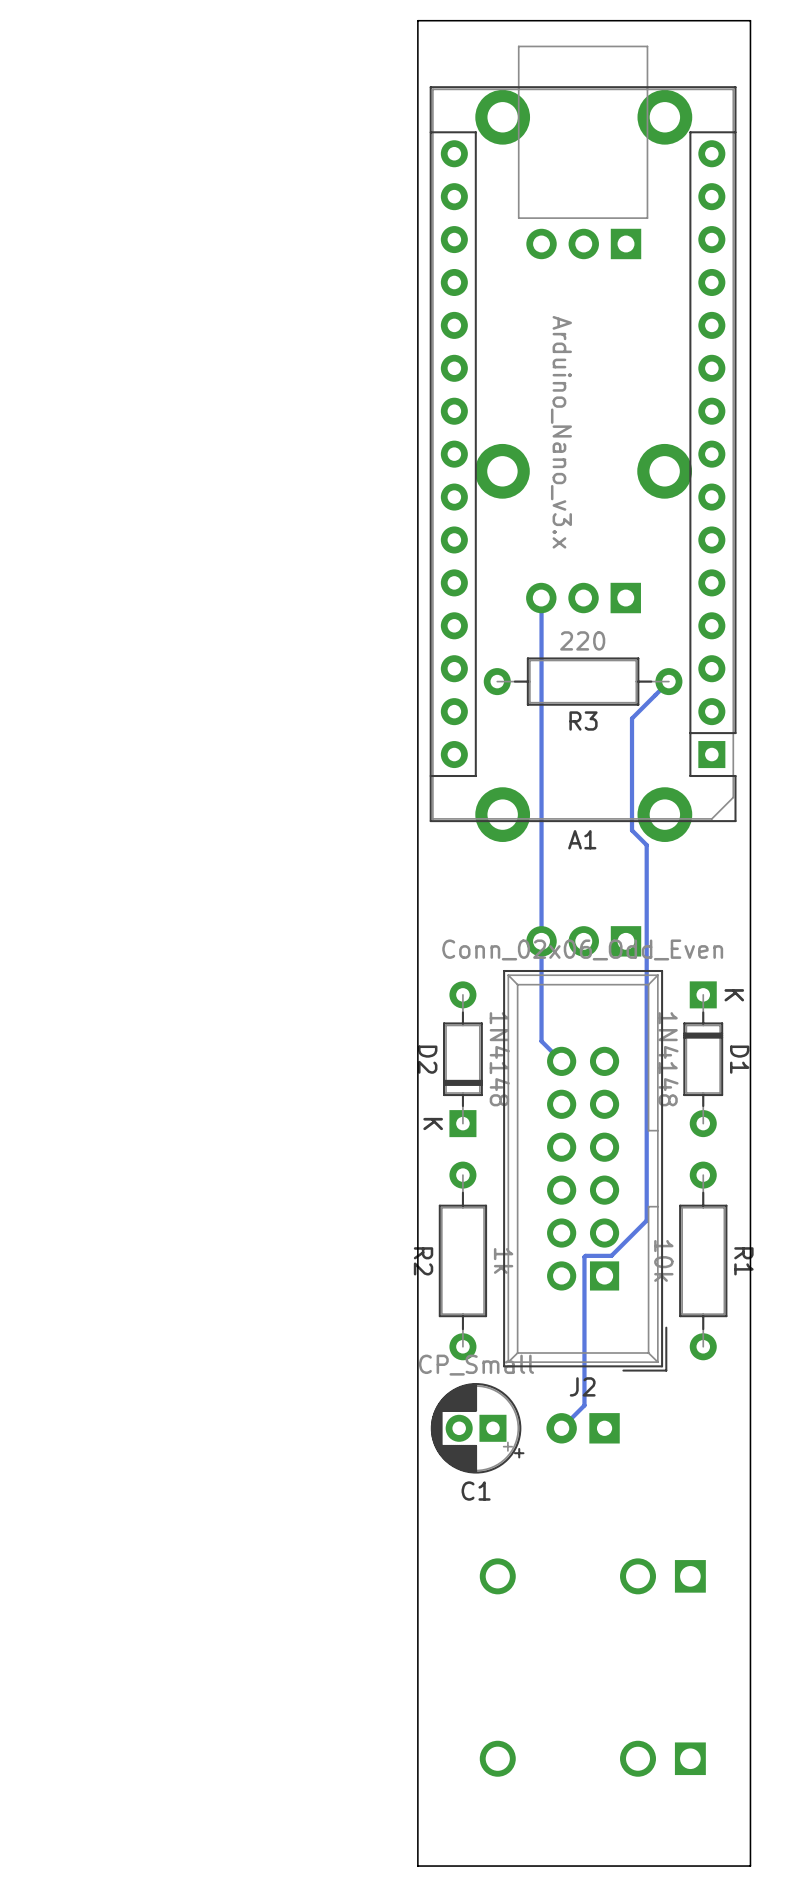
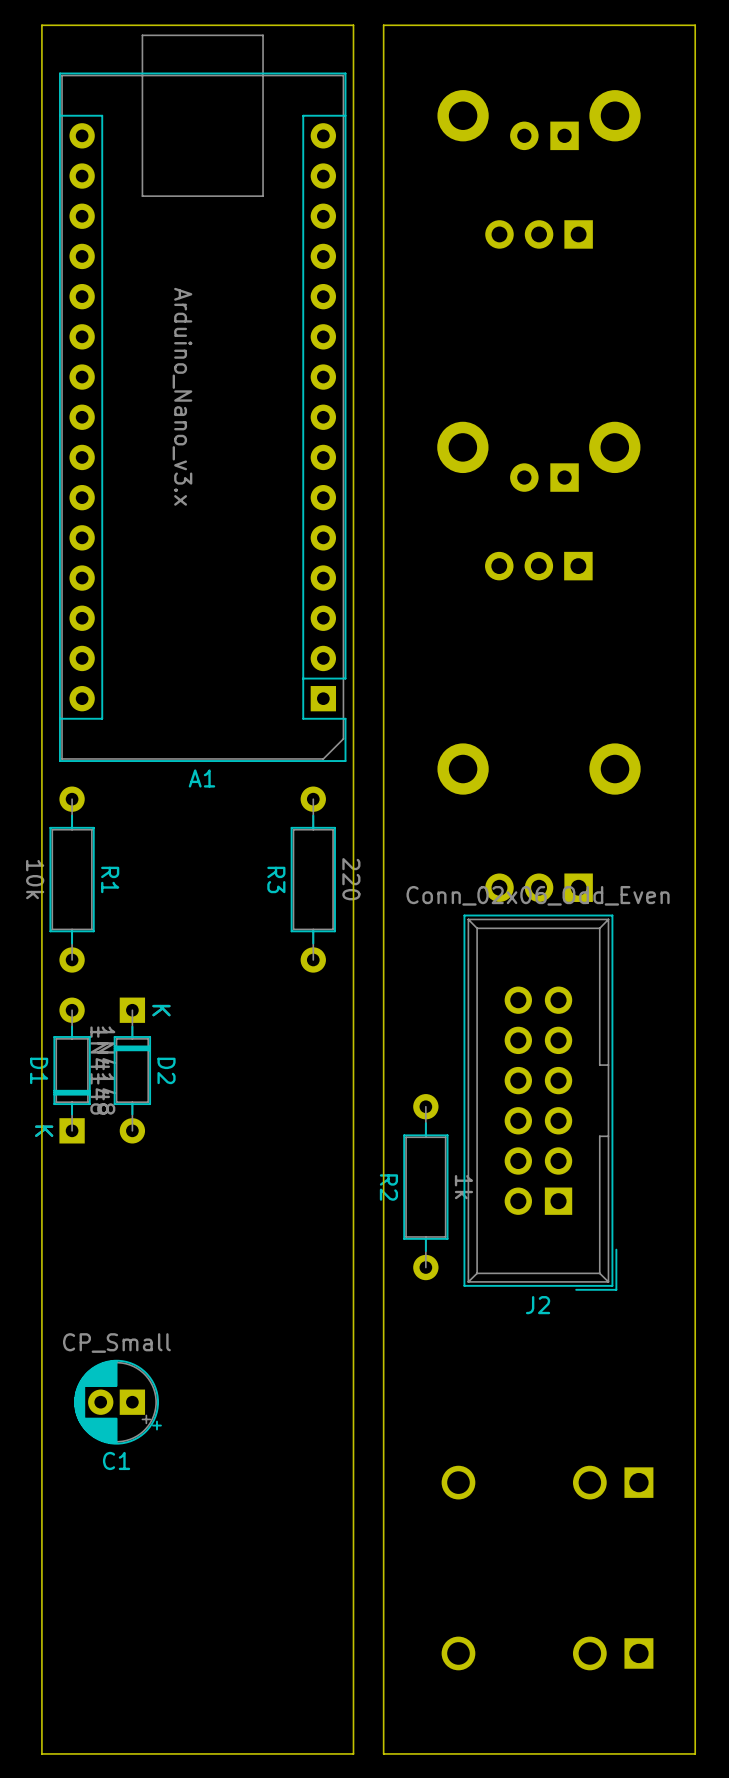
board edge: none -> (353, 25) (353, 1753) (41, 1753) (41, 25) (353, 25)
part: none -> (544, 135)
A1 position: (583, 433) -> (202, 398)
part: none -> (544, 477)
track: (541, 598) (541, 1041) (561, 1061) -> none
R3 rotation: 0° (583, 681) -> 90° clockwise (313, 879)
R3 position: (583, 681) -> (313, 879)
track: (668, 681) (632, 718) (632, 830) (646, 845) (646, 1220) (611, 1255) (584, 1256) (584, 1405) (561, 1428) -> none
D2 rotation: 0° (462, 1059) -> 180° (132, 1070)
D2 position: (462, 1059) -> (132, 1070)
D1 rotation: 0° (703, 1059) -> 180° (72, 1070)
D1 position: (703, 1059) -> (72, 1070)
R1 position: (703, 1260) -> (72, 879)
C1 position: (477, 1428) -> (118, 1402)
part: (583, 1428) -> none

